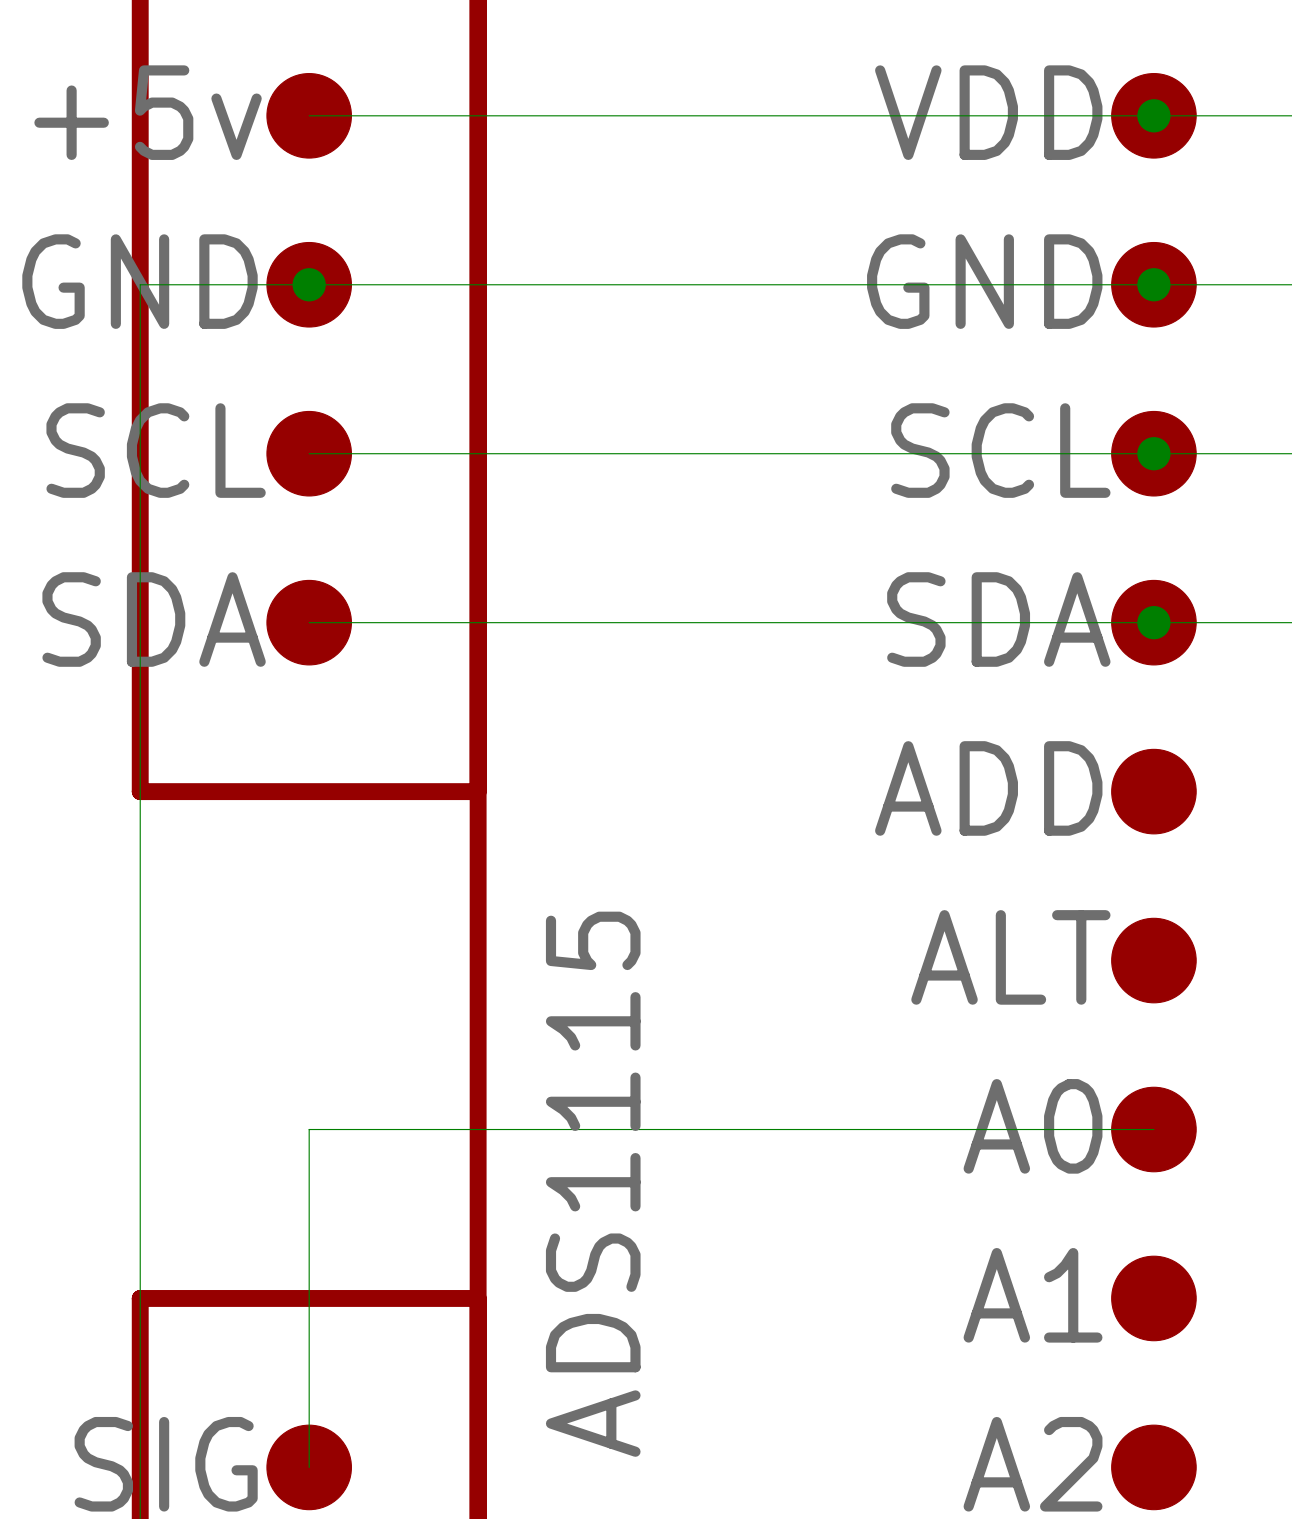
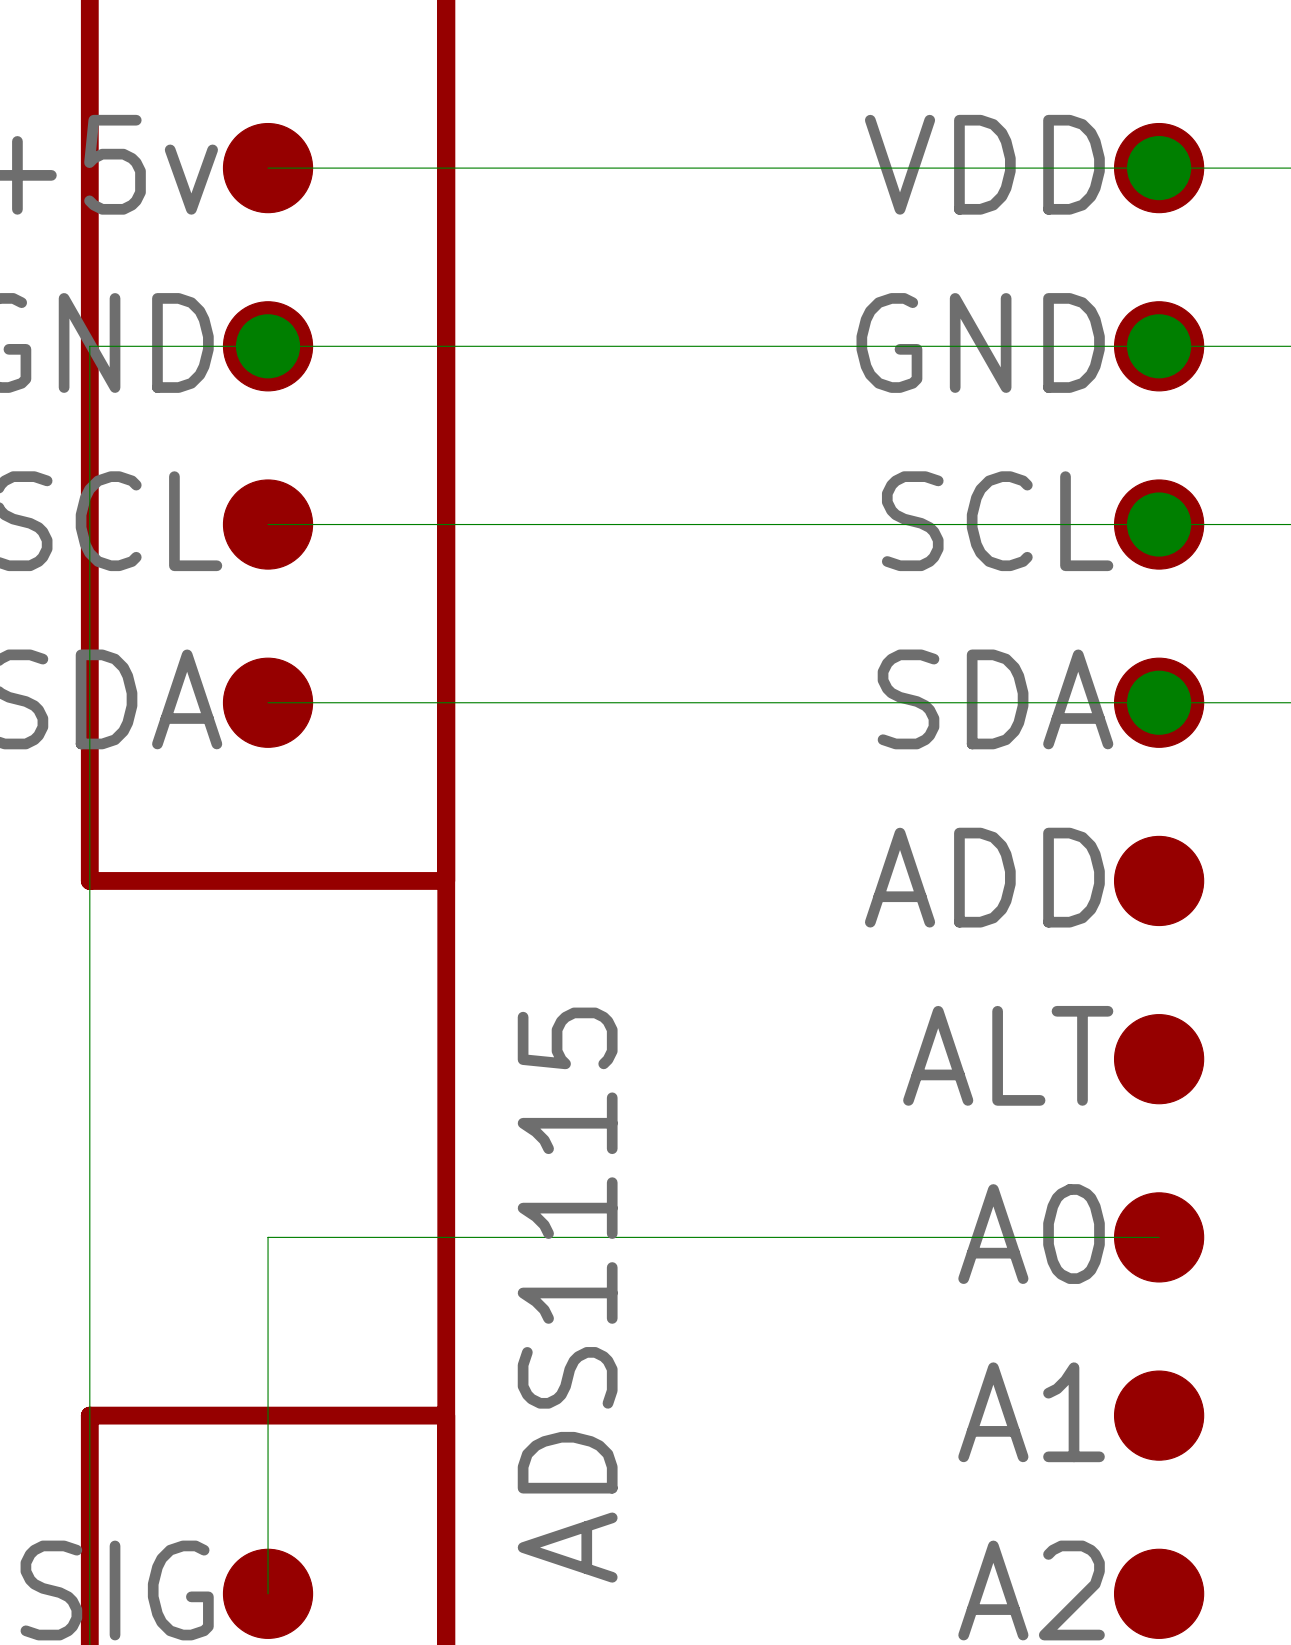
junction size: [1137, 99, 1171, 133] -> [1127, 136, 1192, 201]
junction size: [292, 268, 326, 302] -> [235, 314, 301, 379]
junction size: [1137, 268, 1171, 302] -> [1127, 314, 1192, 379]
junction size: [1137, 437, 1171, 471] -> [1127, 492, 1192, 557]
junction size: [1137, 606, 1171, 640] -> [1127, 670, 1192, 735]

